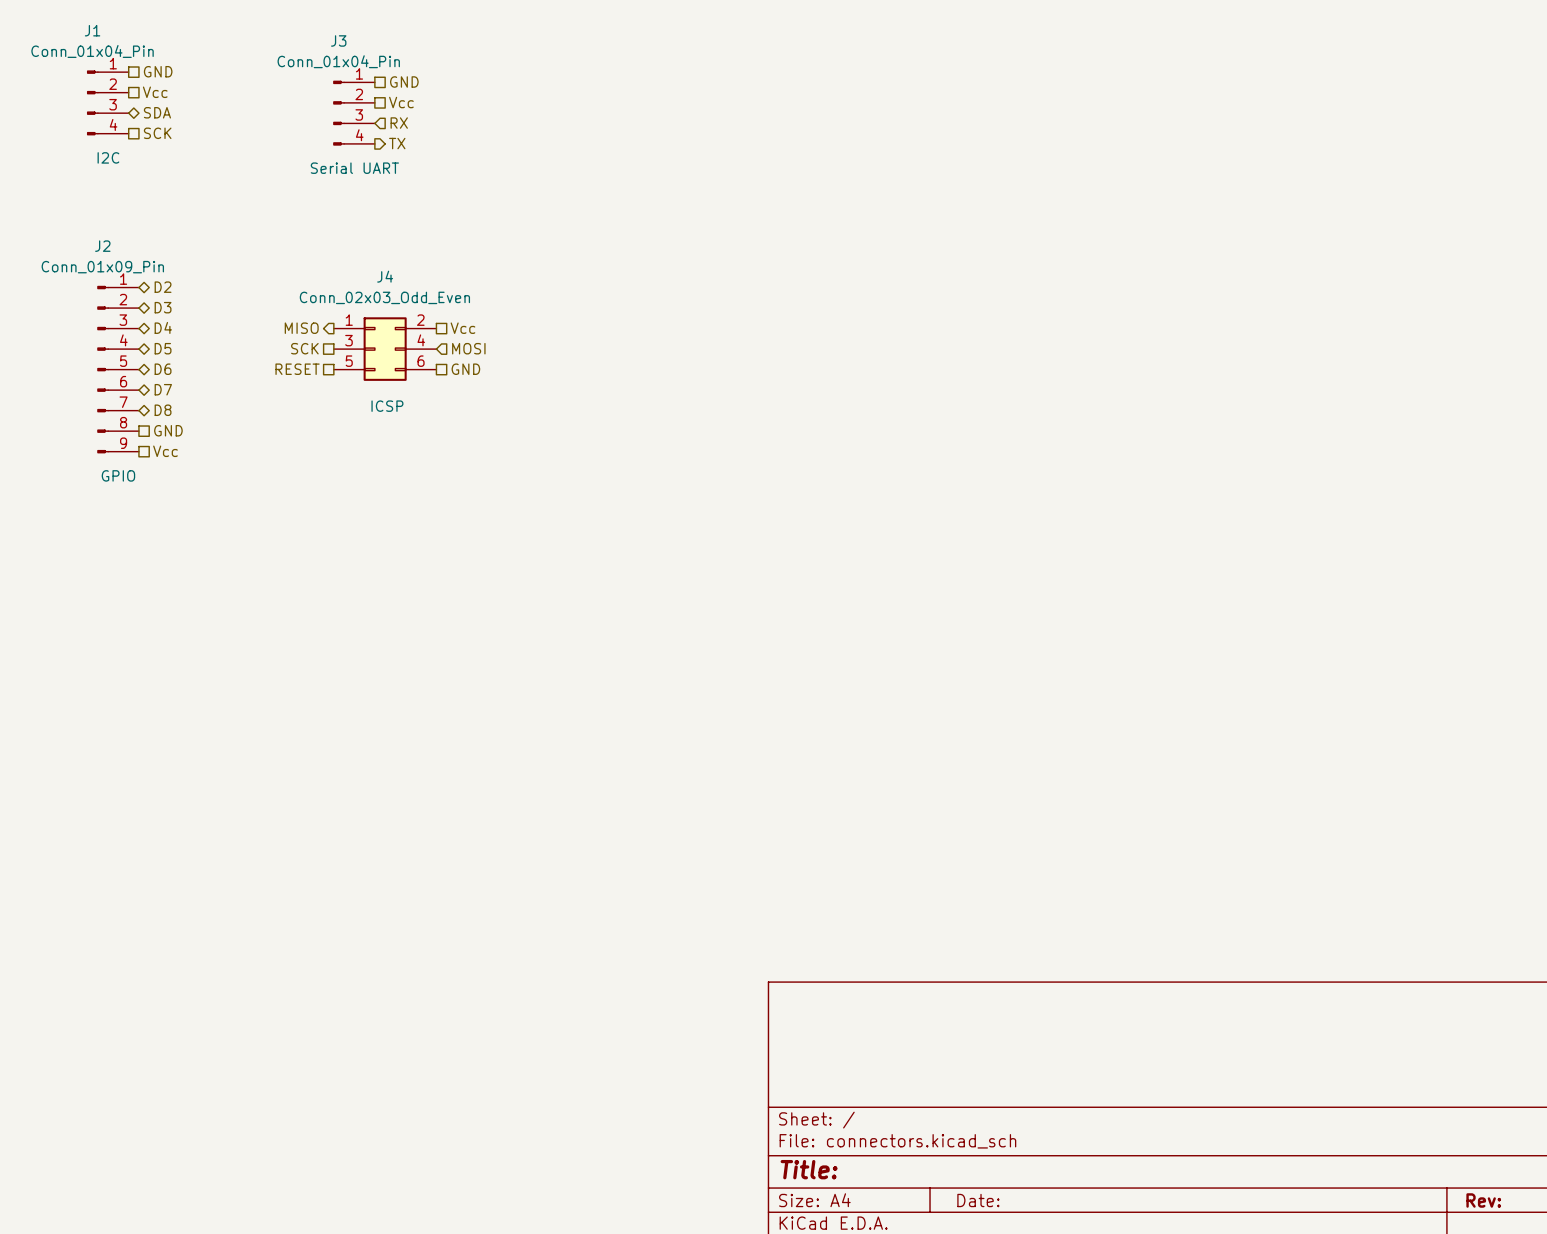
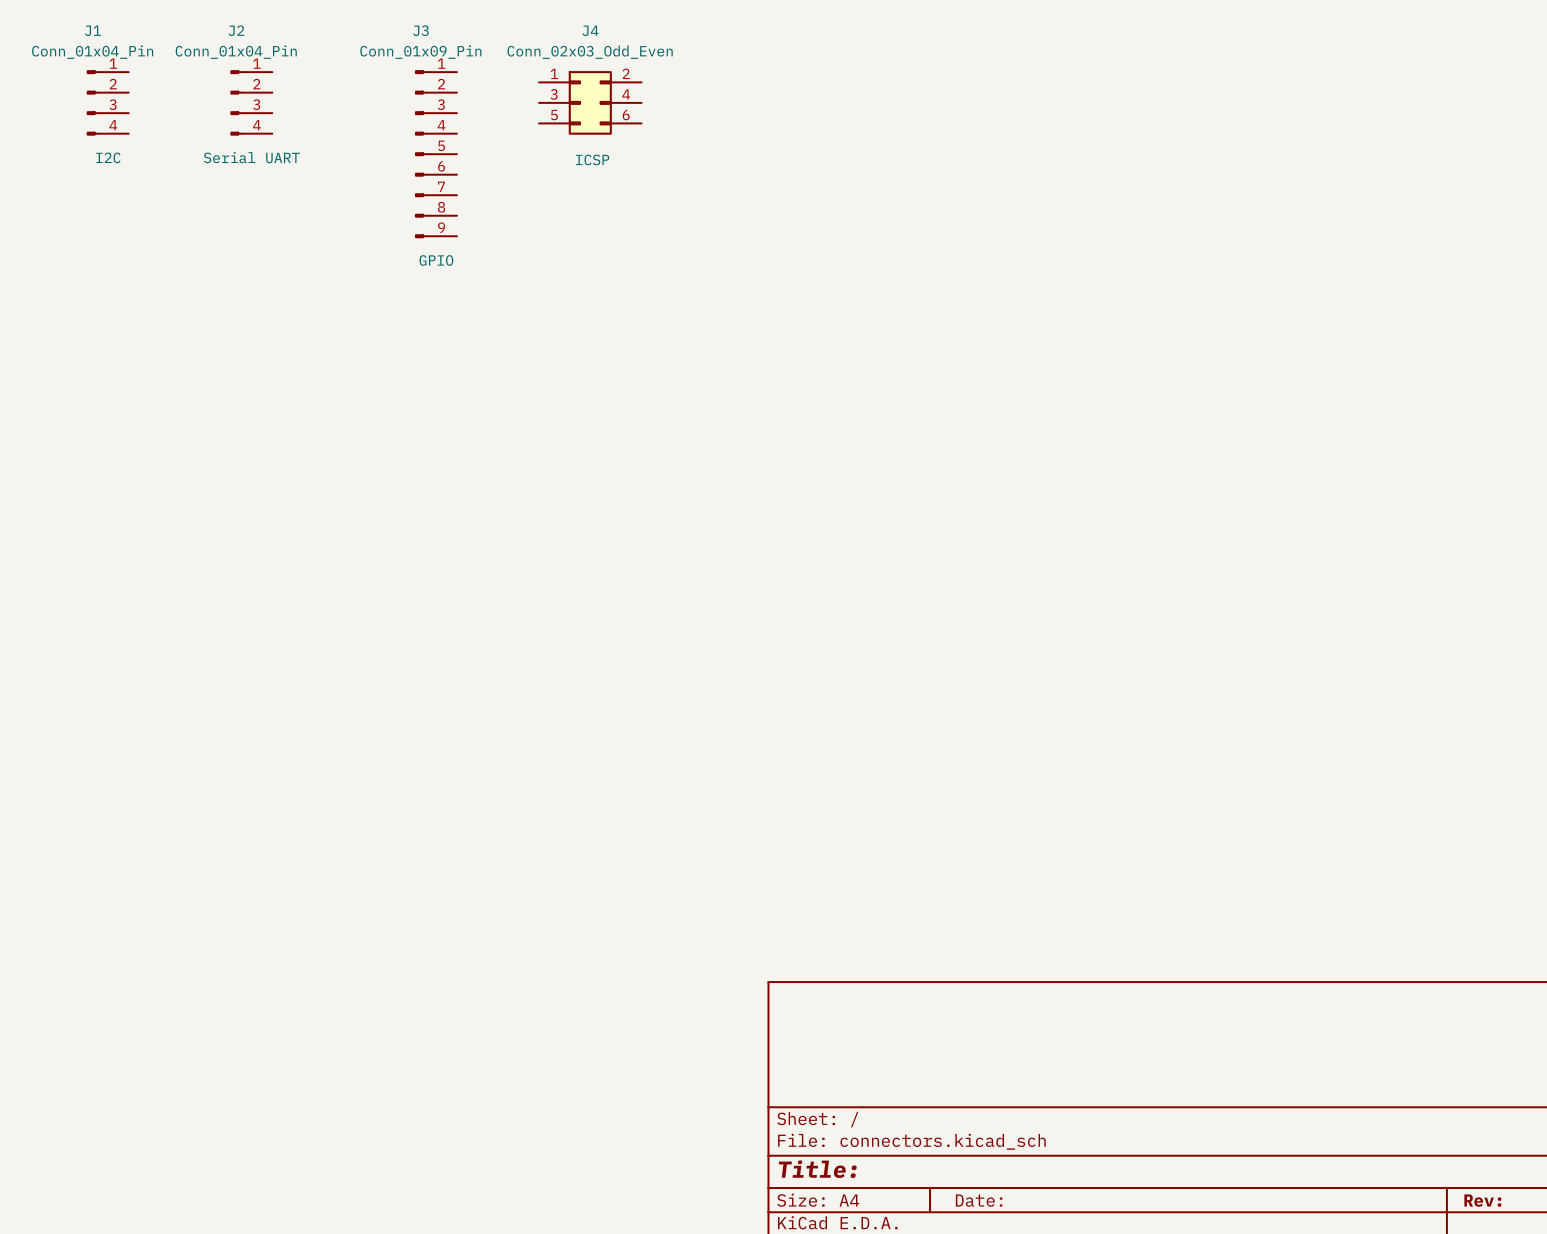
J3 name position: J3 (338, 40) -> J3 (420, 30)
J3 value: Conn_01x04_Pin (338, 61) -> Conn_01x09_Pin (420, 52)
hierarchical label: GND (158, 71) -> none
J3 symbol: [333, 80, 375, 146] -> [415, 70, 457, 238]
hierarchical label: GND (404, 82) -> none
hierarchical label: Vcc (155, 92) -> none
hierarchical label: Vcc (401, 102) -> none
hierarchical label: SDA (157, 112) -> none
hierarchical label: RX (399, 123) -> none
hierarchical label: SCK (157, 133) -> none
hierarchical label: TX (397, 143) -> none
J3 text: Serial UART (354, 168) -> GPIO (436, 260)
J2 name position: J2 (102, 246) -> J2 (236, 30)
J2 value: Conn_01x09_Pin (102, 267) -> Conn_01x04_Pin (236, 52)
J2 symbol: [97, 285, 139, 454] -> [230, 70, 273, 136]
hierarchical label: D2 (163, 287) -> none
hierarchical label: D3 (163, 307) -> none
hierarchical label: D4 (163, 327) -> none
hierarchical label: MISO (301, 328) -> none
hierarchical label: Vcc (462, 328) -> none
hierarchical label: D5 (163, 348) -> none
hierarchical label: SCK (304, 348) -> none
hierarchical label: MOSI (468, 348) -> none
J4 position: (385, 349) -> (590, 102)
hierarchical label: D6 (163, 369) -> none
hierarchical label: RESET (297, 369) -> none
hierarchical label: GND (465, 369) -> none
hierarchical label: D7 (163, 389) -> none
hierarchical label: D8 (163, 410) -> none
hierarchical label: GND (168, 430) -> none
hierarchical label: Vcc (165, 451) -> none
J2 text: GPIO (118, 475) -> Serial UART (251, 157)

